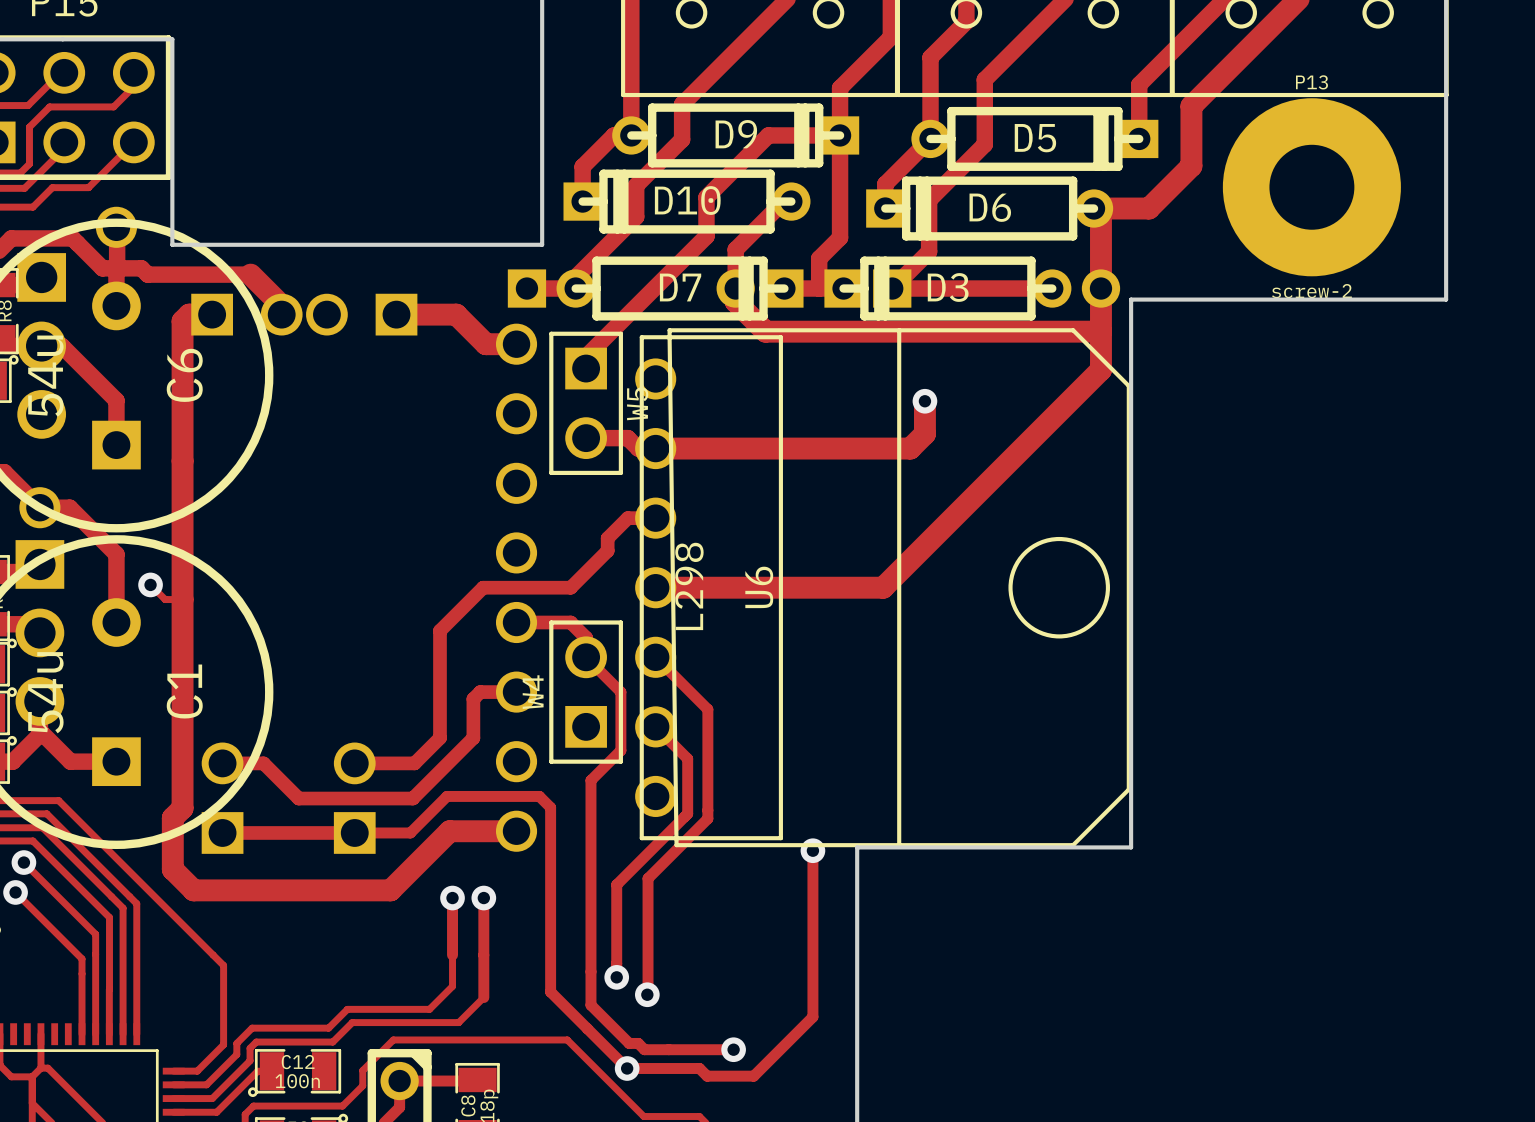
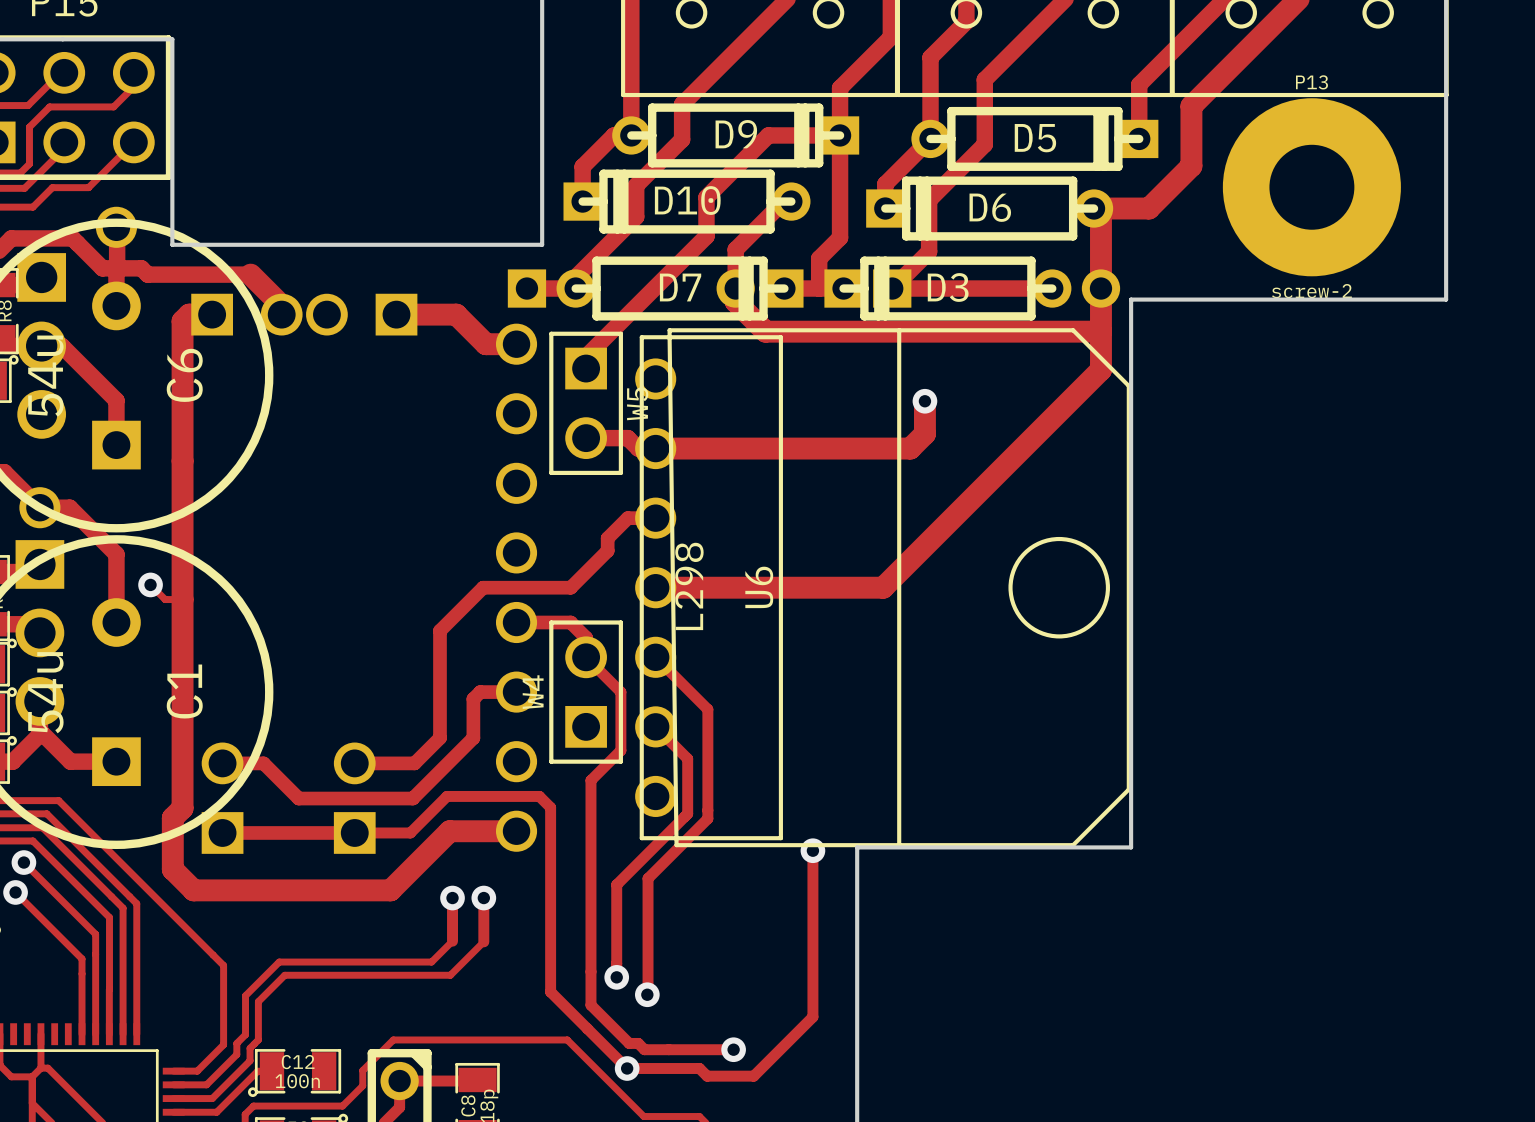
track: (452, 941) (452, 986) (429, 1009) (347, 1009) (328, 1028) (252, 1028) (245, 1034) -> (452, 941) (431, 962) (279, 962) (245, 995) (245, 1034)
track: (483, 941) (483, 997) (458, 1022) (352, 1022) (332, 1042) (256, 1042) -> (483, 941) (450, 975) (284, 975) (258, 1001) (258, 1039) (256, 1042)

